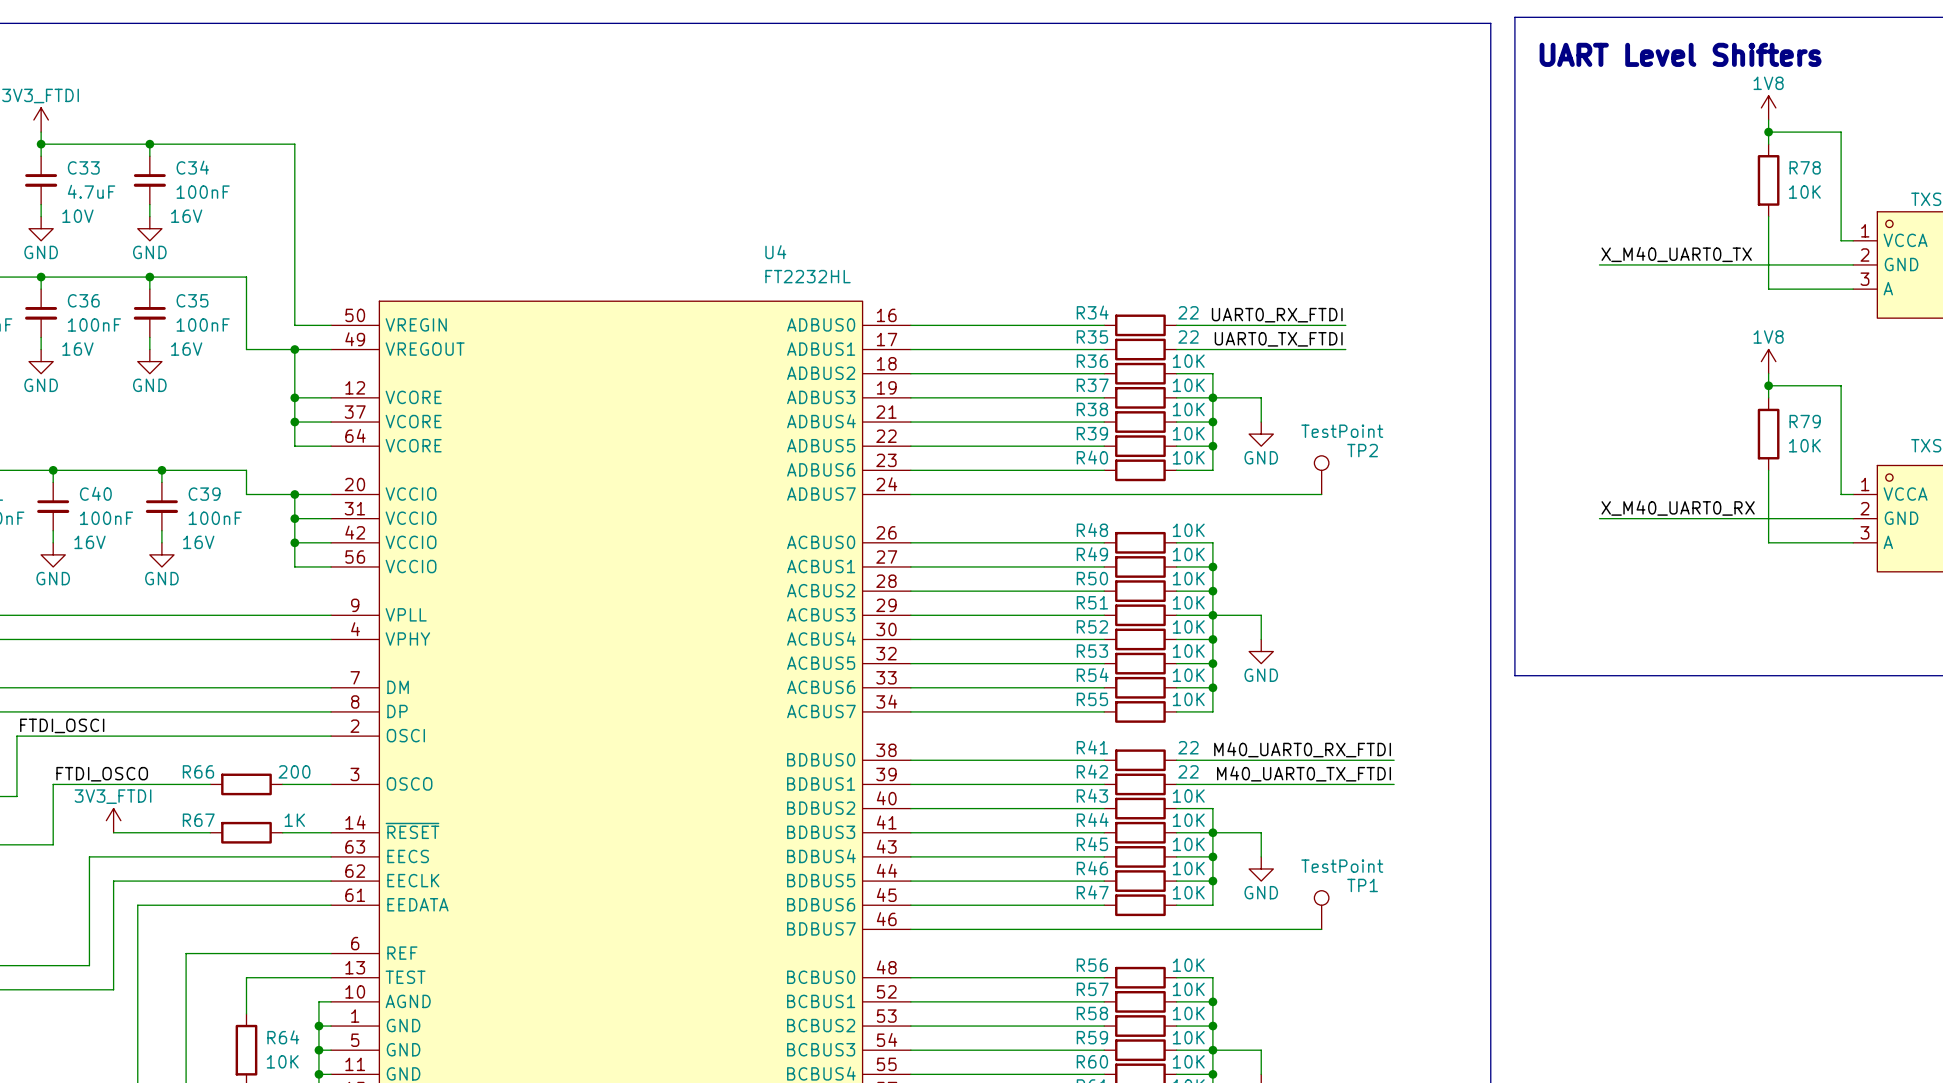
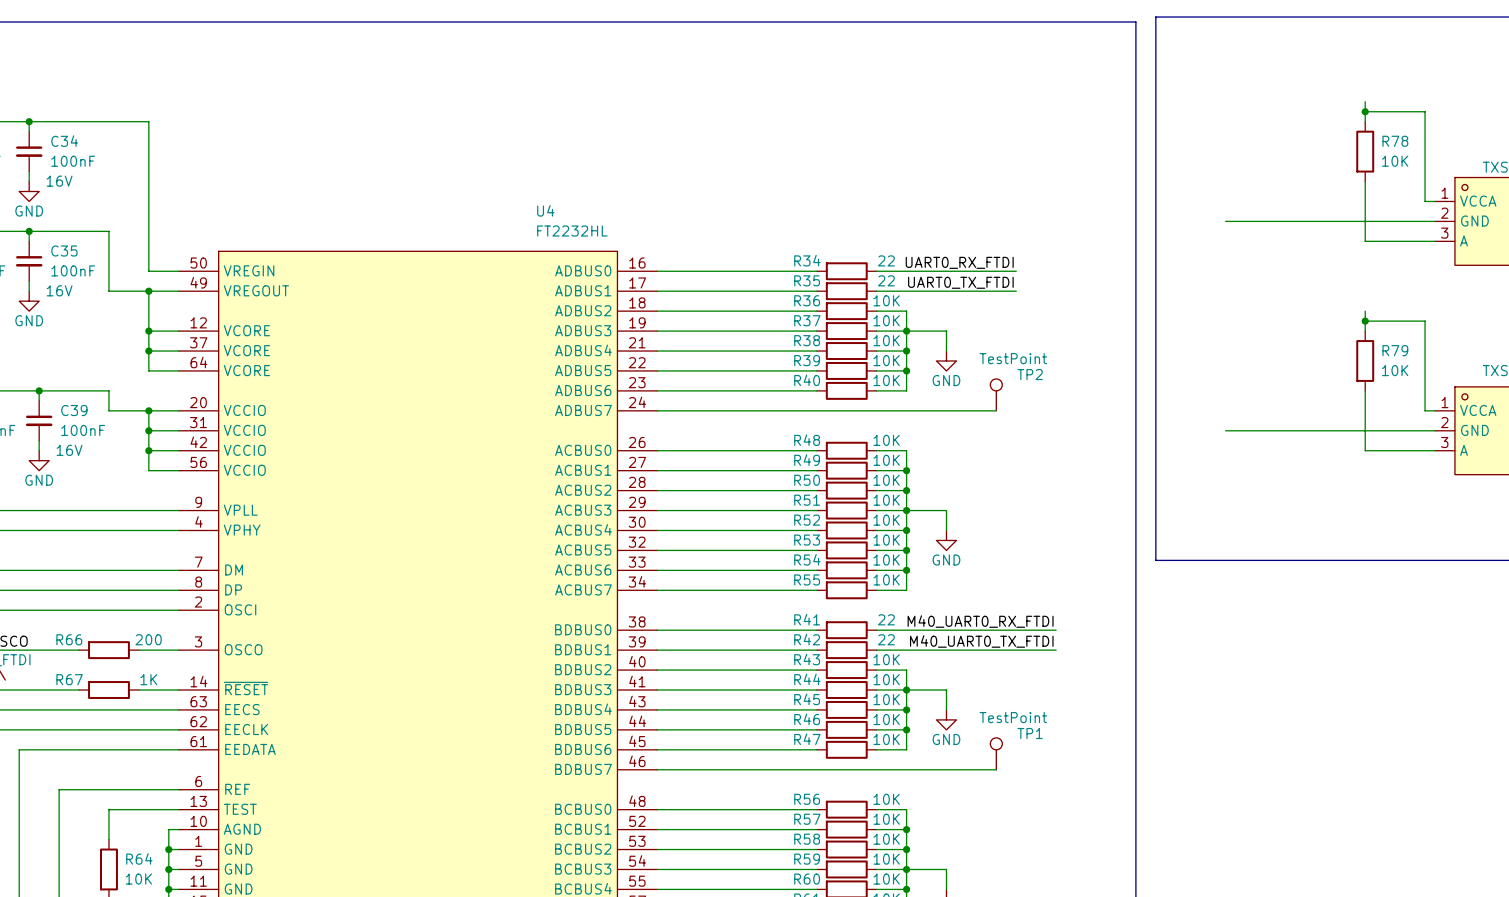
text: UART Level Shifters (1680, 54) -> none
power symbol: 1V8 (1768, 107) -> none
label: X_M40_UART0_TX (1676, 254) -> none
power symbol: 1V8 (1768, 361) -> none
label: X_M40_UART0_RX (1678, 508) -> none

